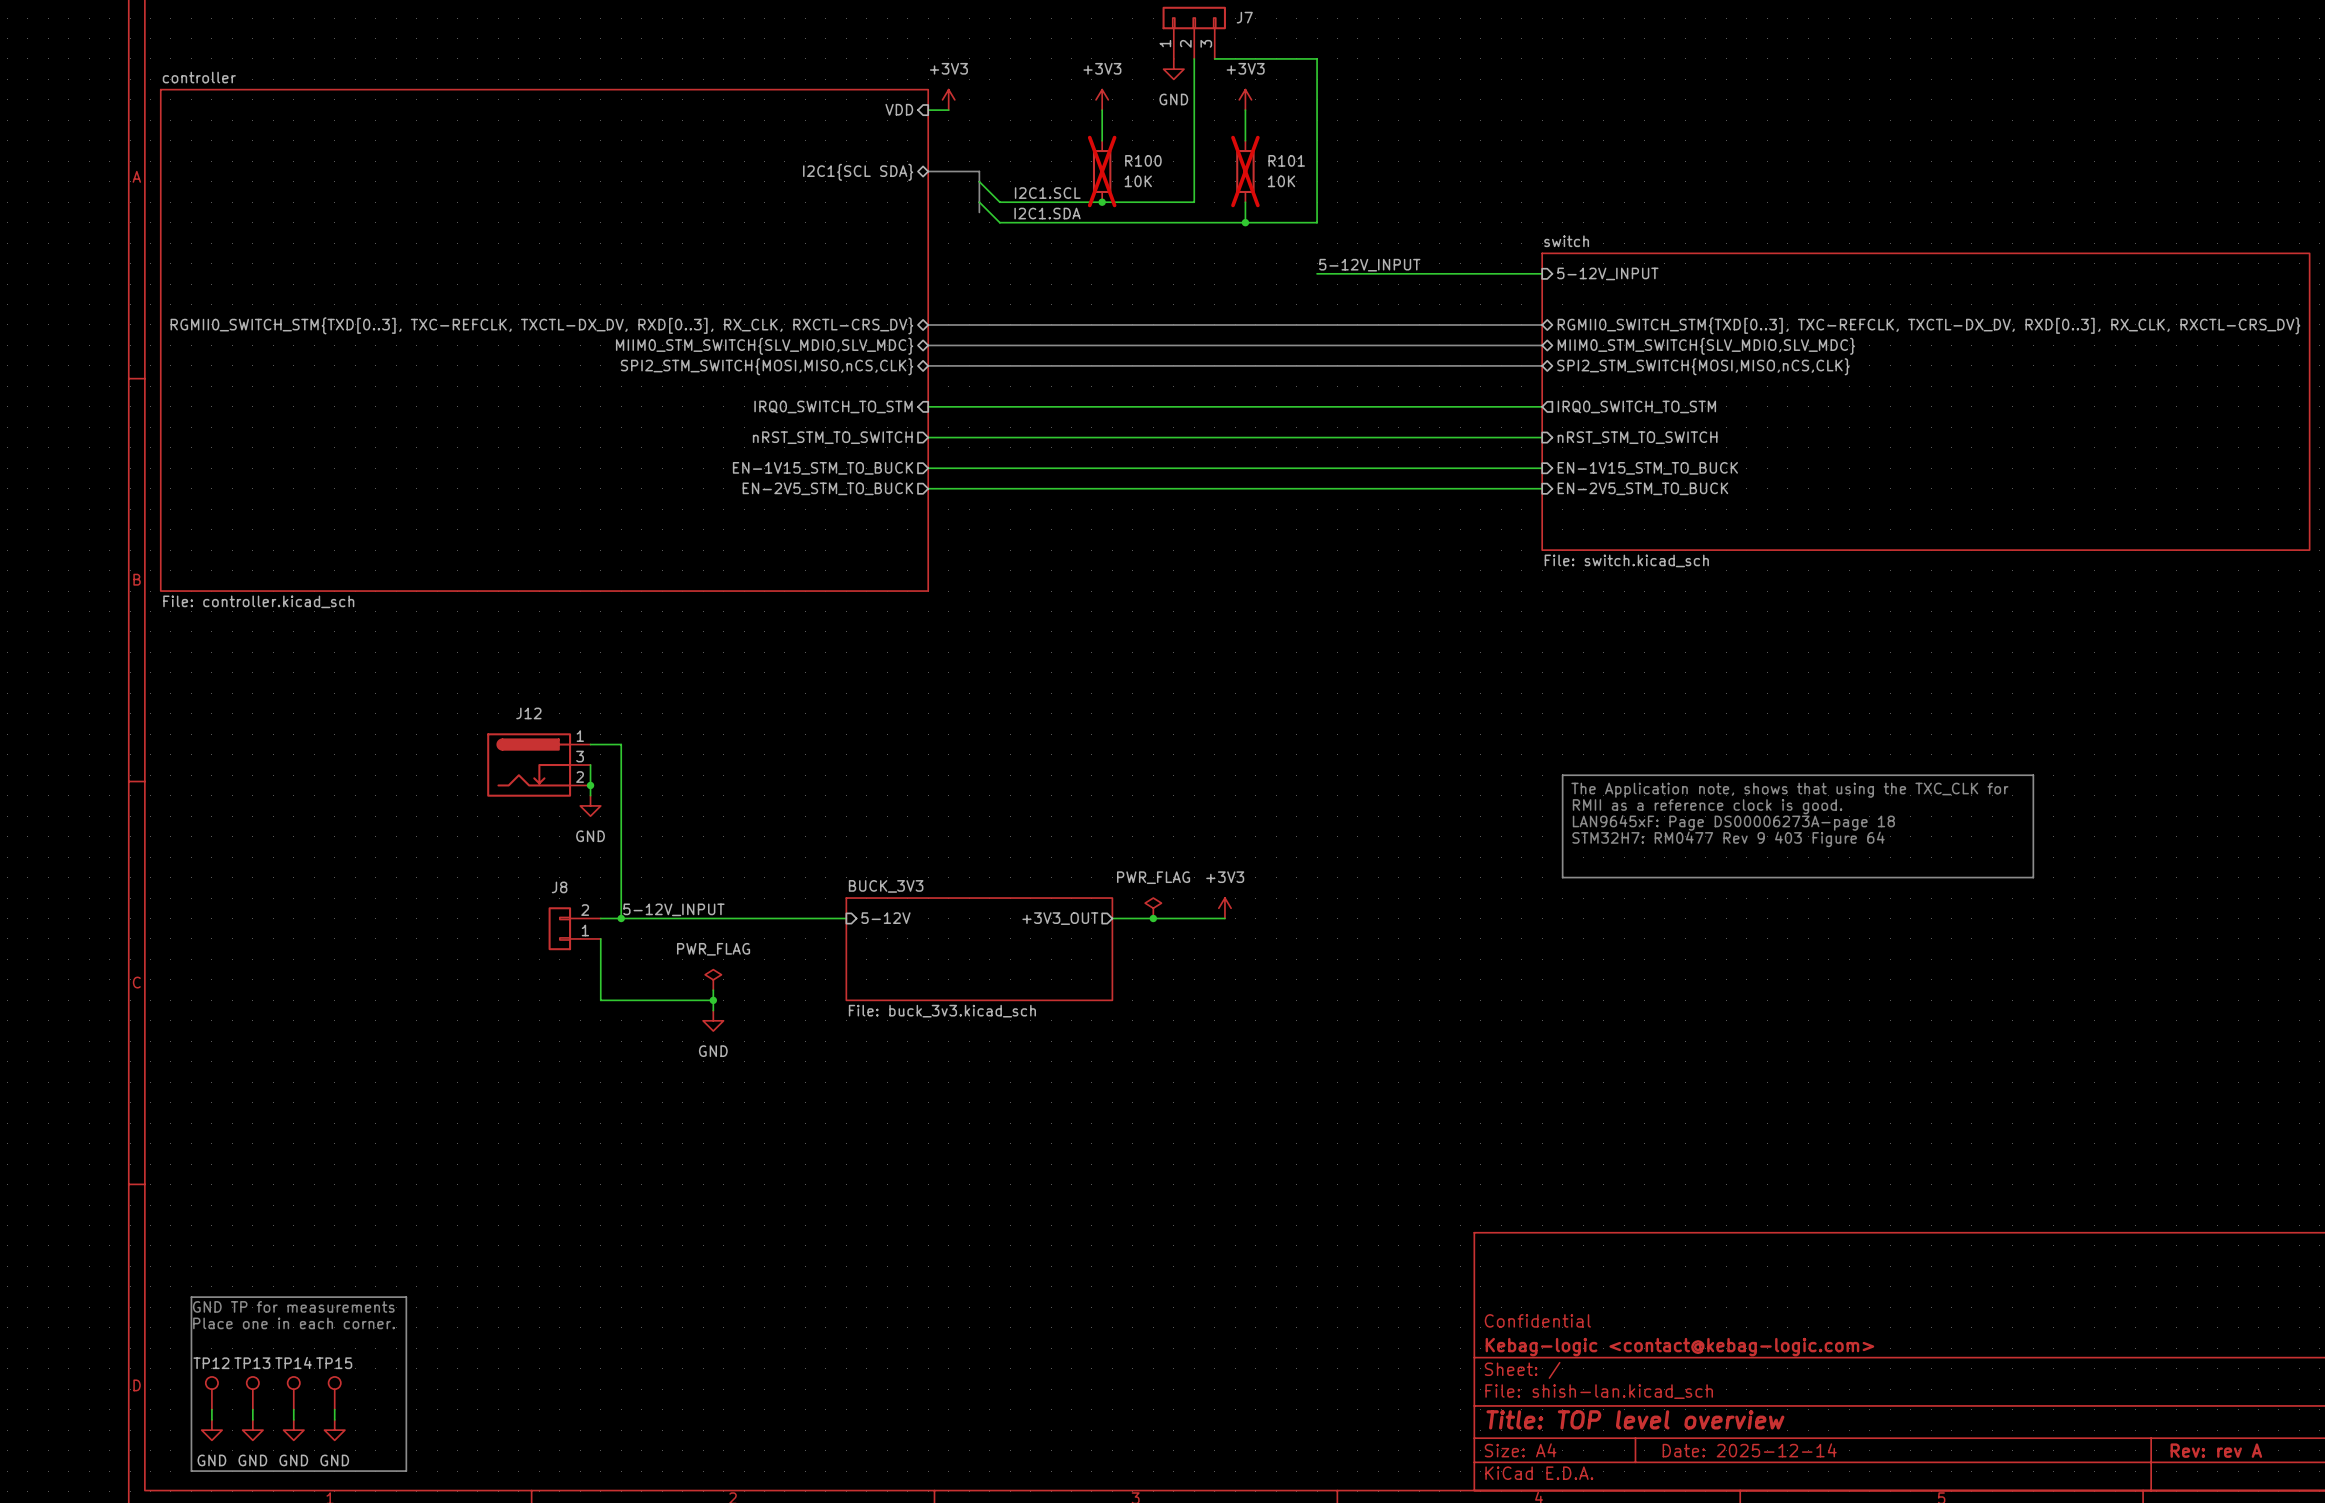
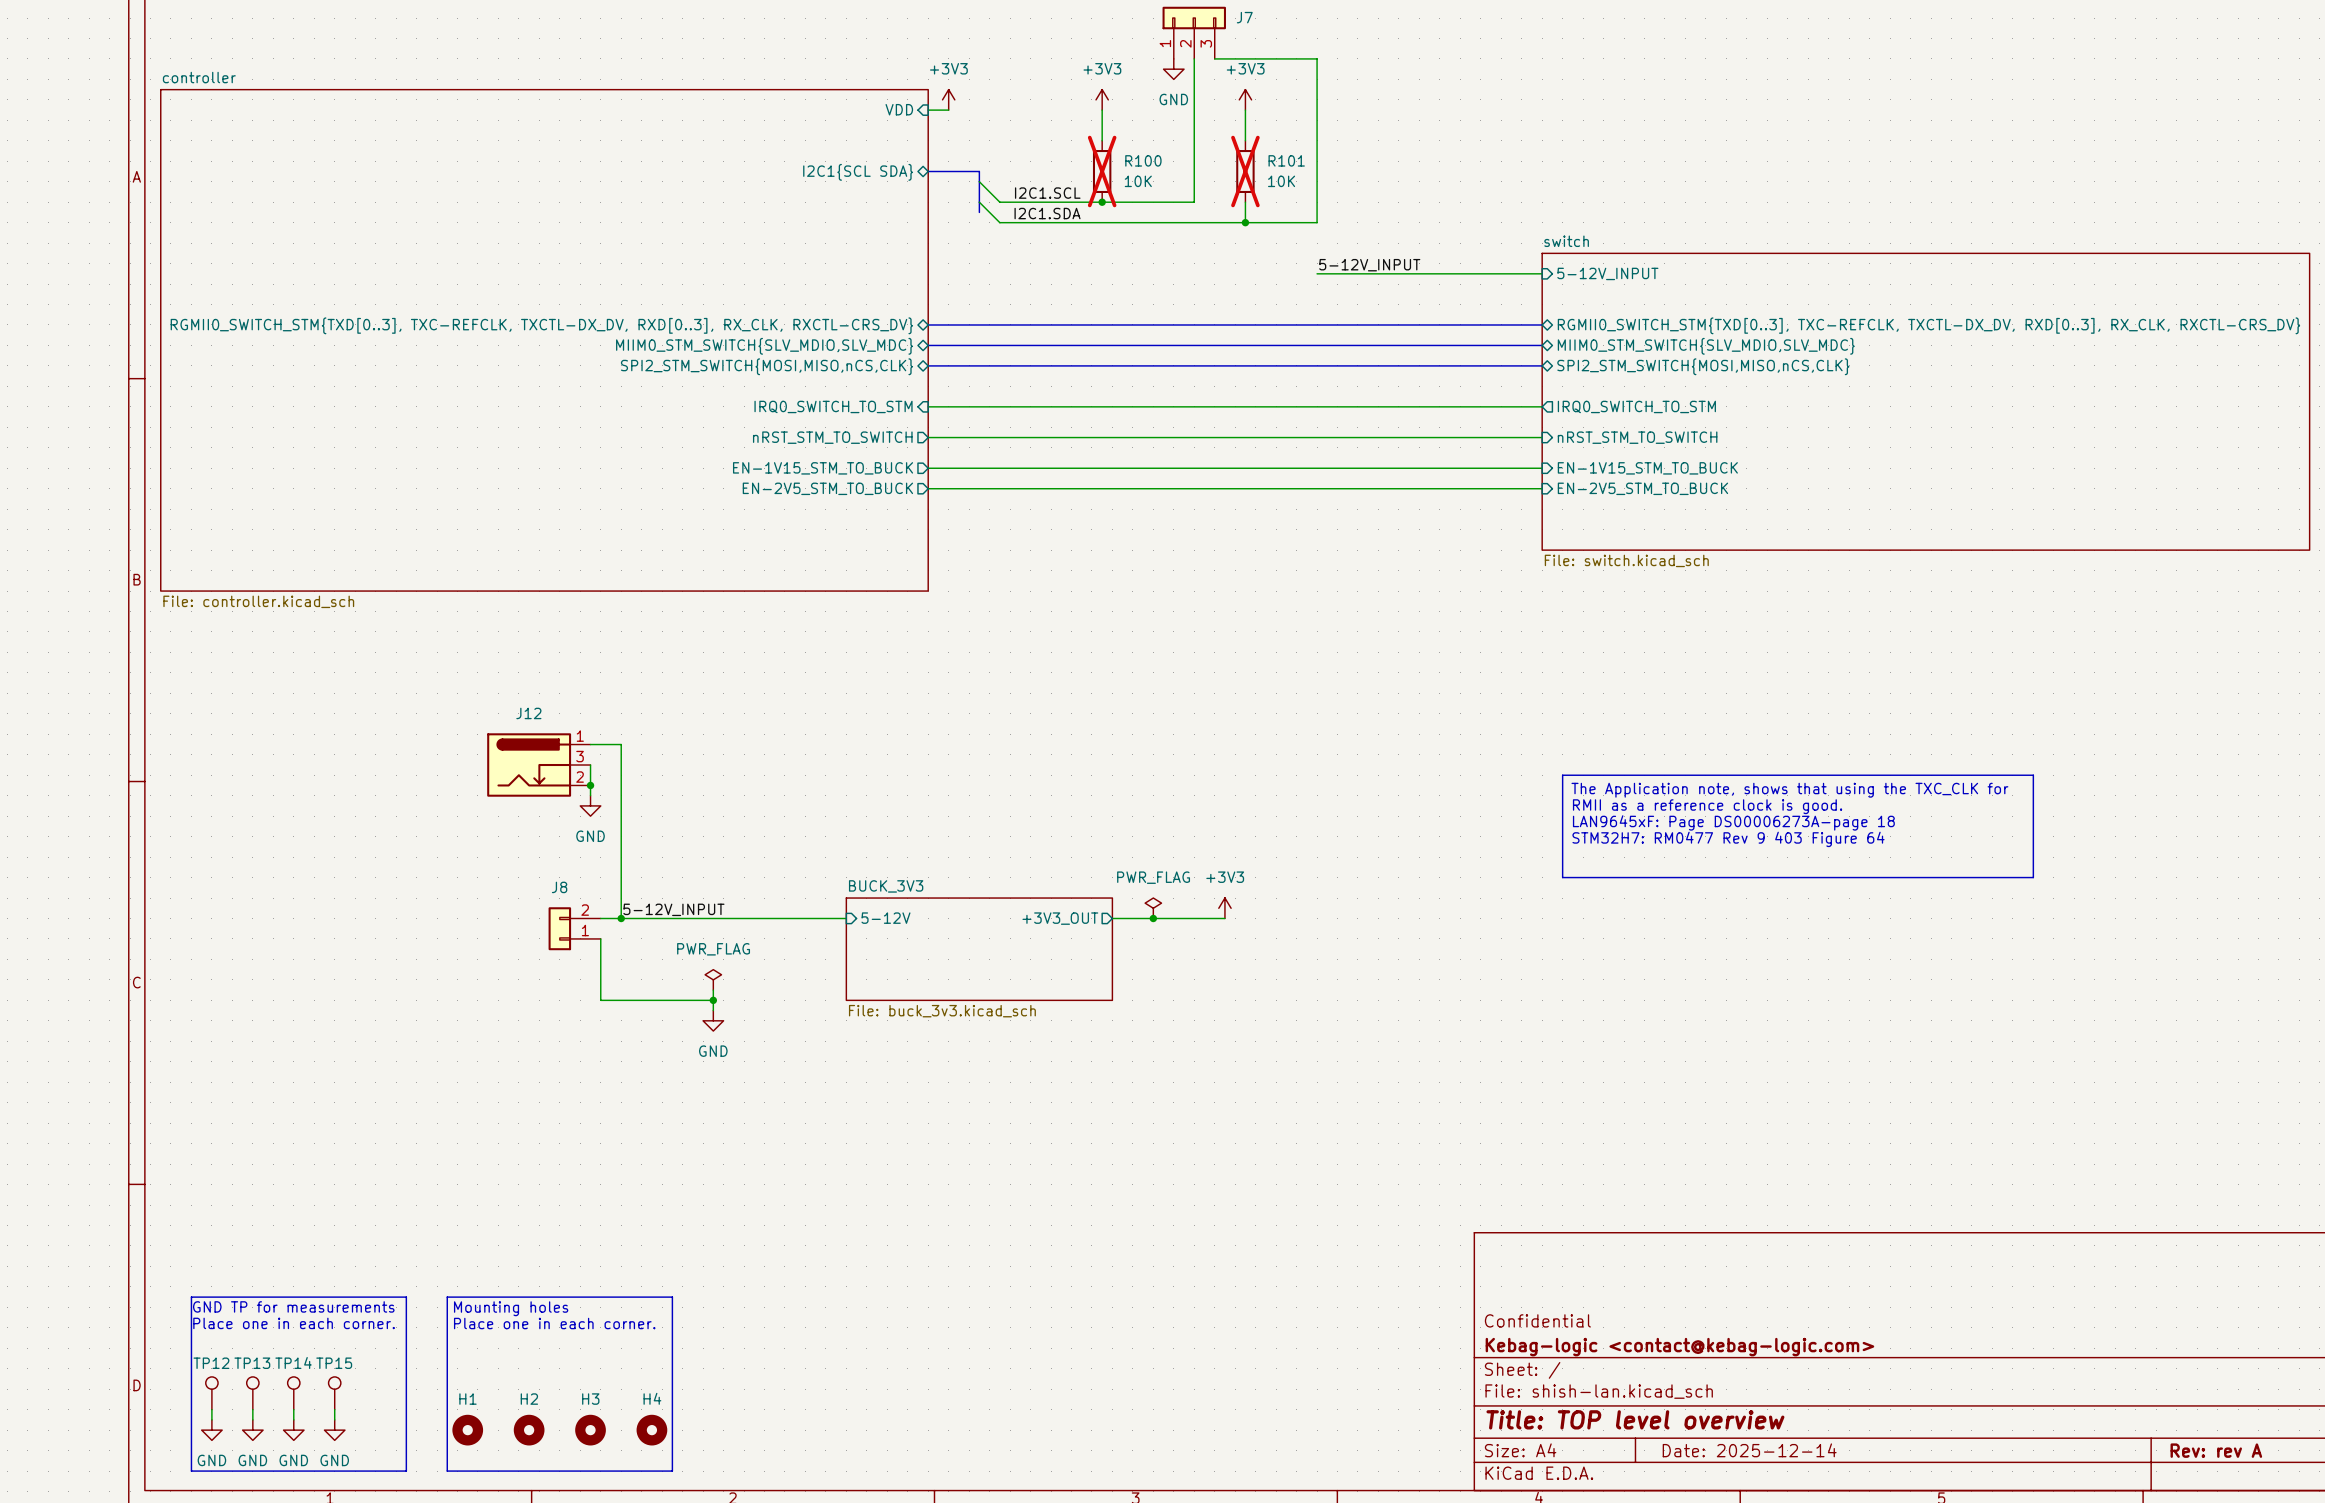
line: none -> (447, 1297) (672, 1297) (672, 1471) (447, 1471) (447, 1297)
text: none -> Mounting holes (511, 1308)
text: none -> Place one in each corner. (554, 1323)
H1: none -> (467, 1430)
H2: none -> (529, 1430)
H3: none -> (590, 1430)
H4: none -> (651, 1430)

